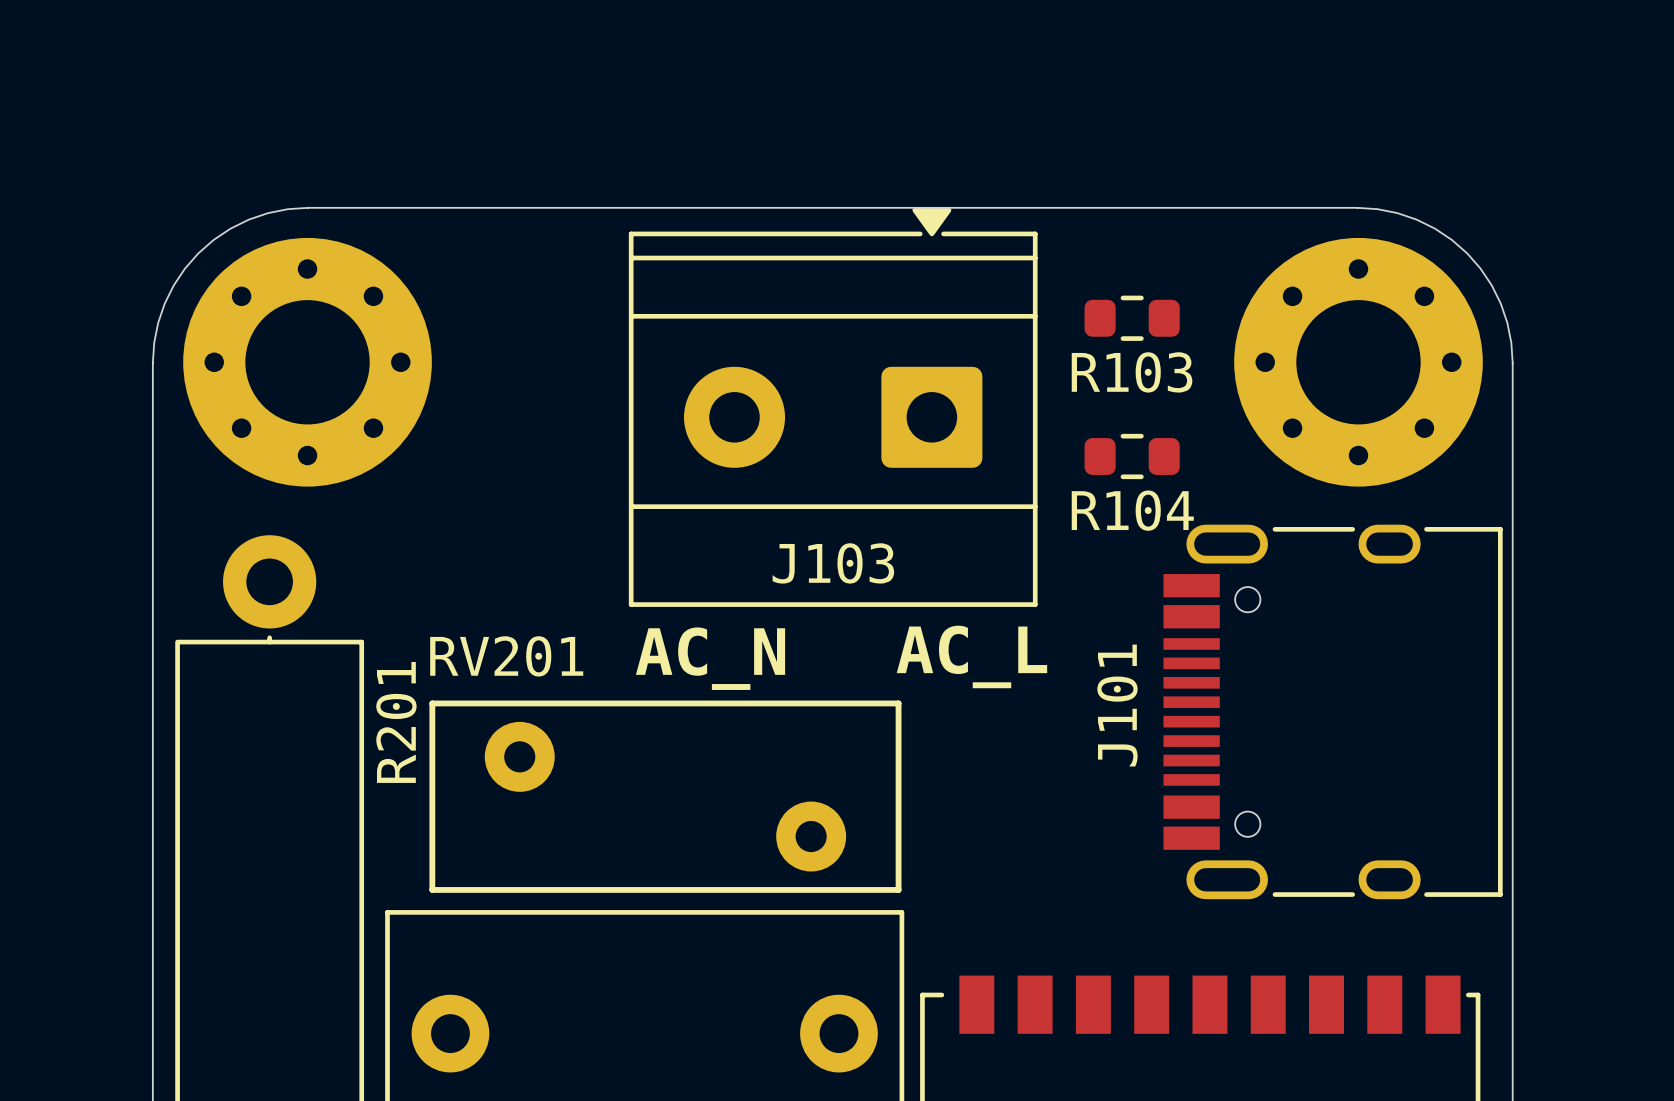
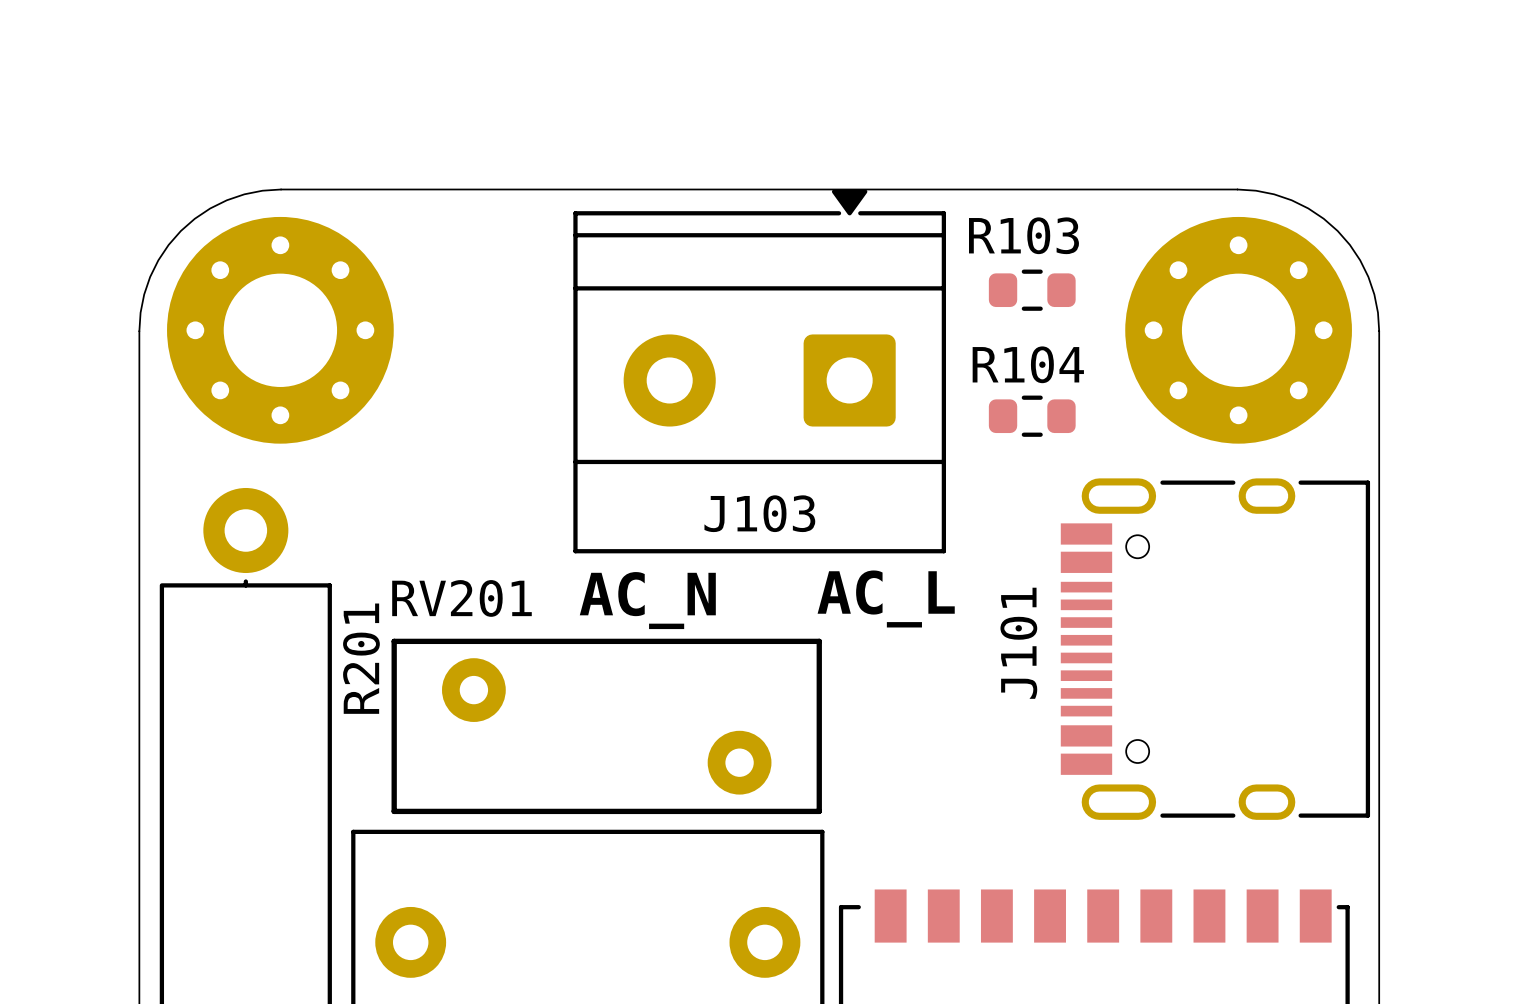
R103 name position: R103 (1132, 372) -> R103 (1023, 235)
R104 name position: R104 (1132, 510) -> R104 (1028, 364)

